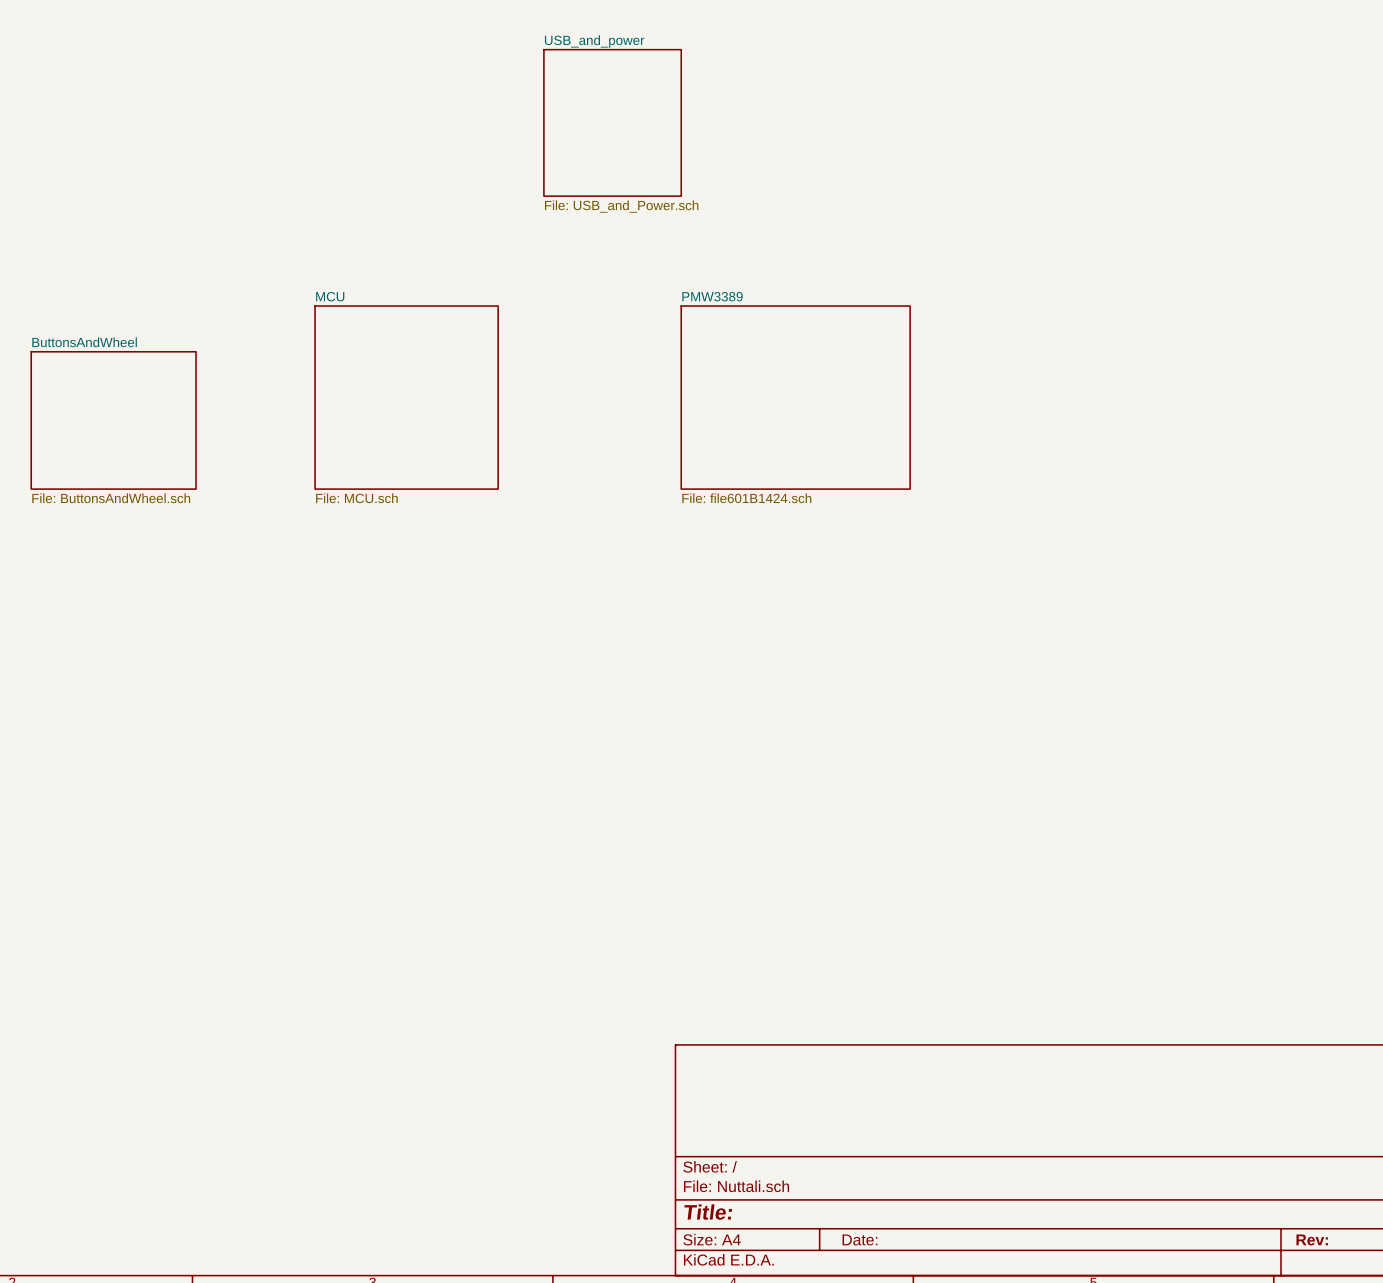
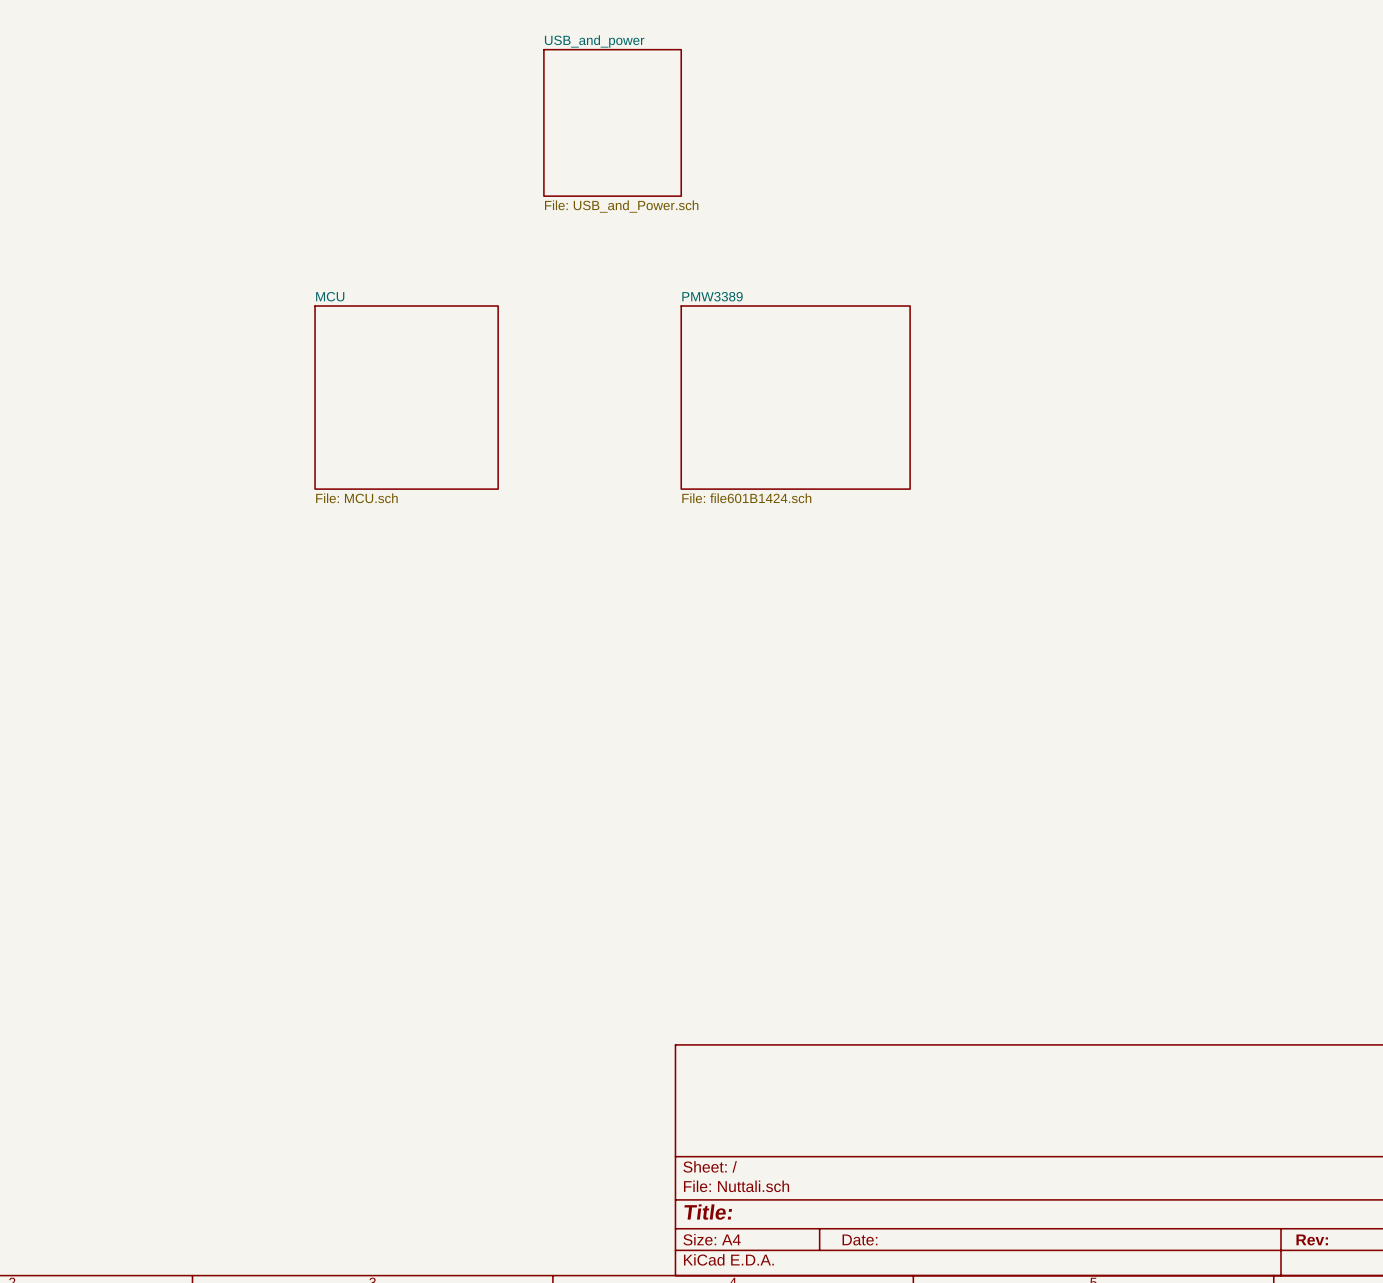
sheet ButtonsAndWheel: File: ButtonsAndWheel.sch (113, 420) -> none

